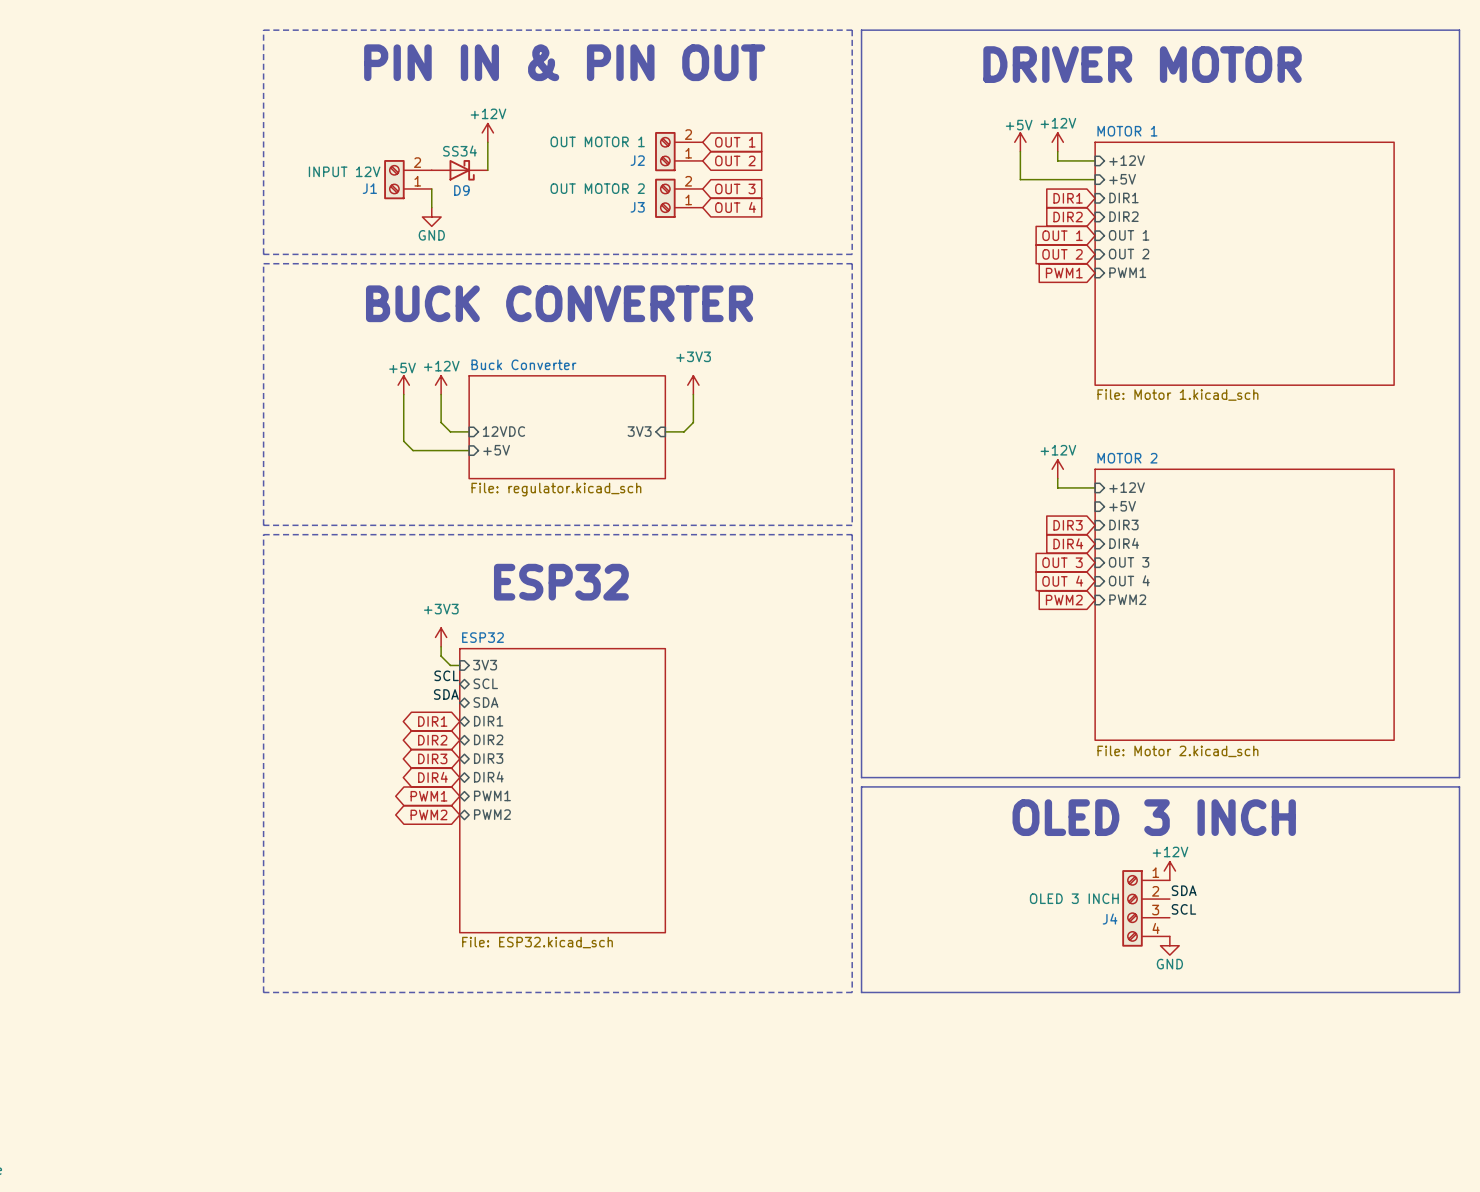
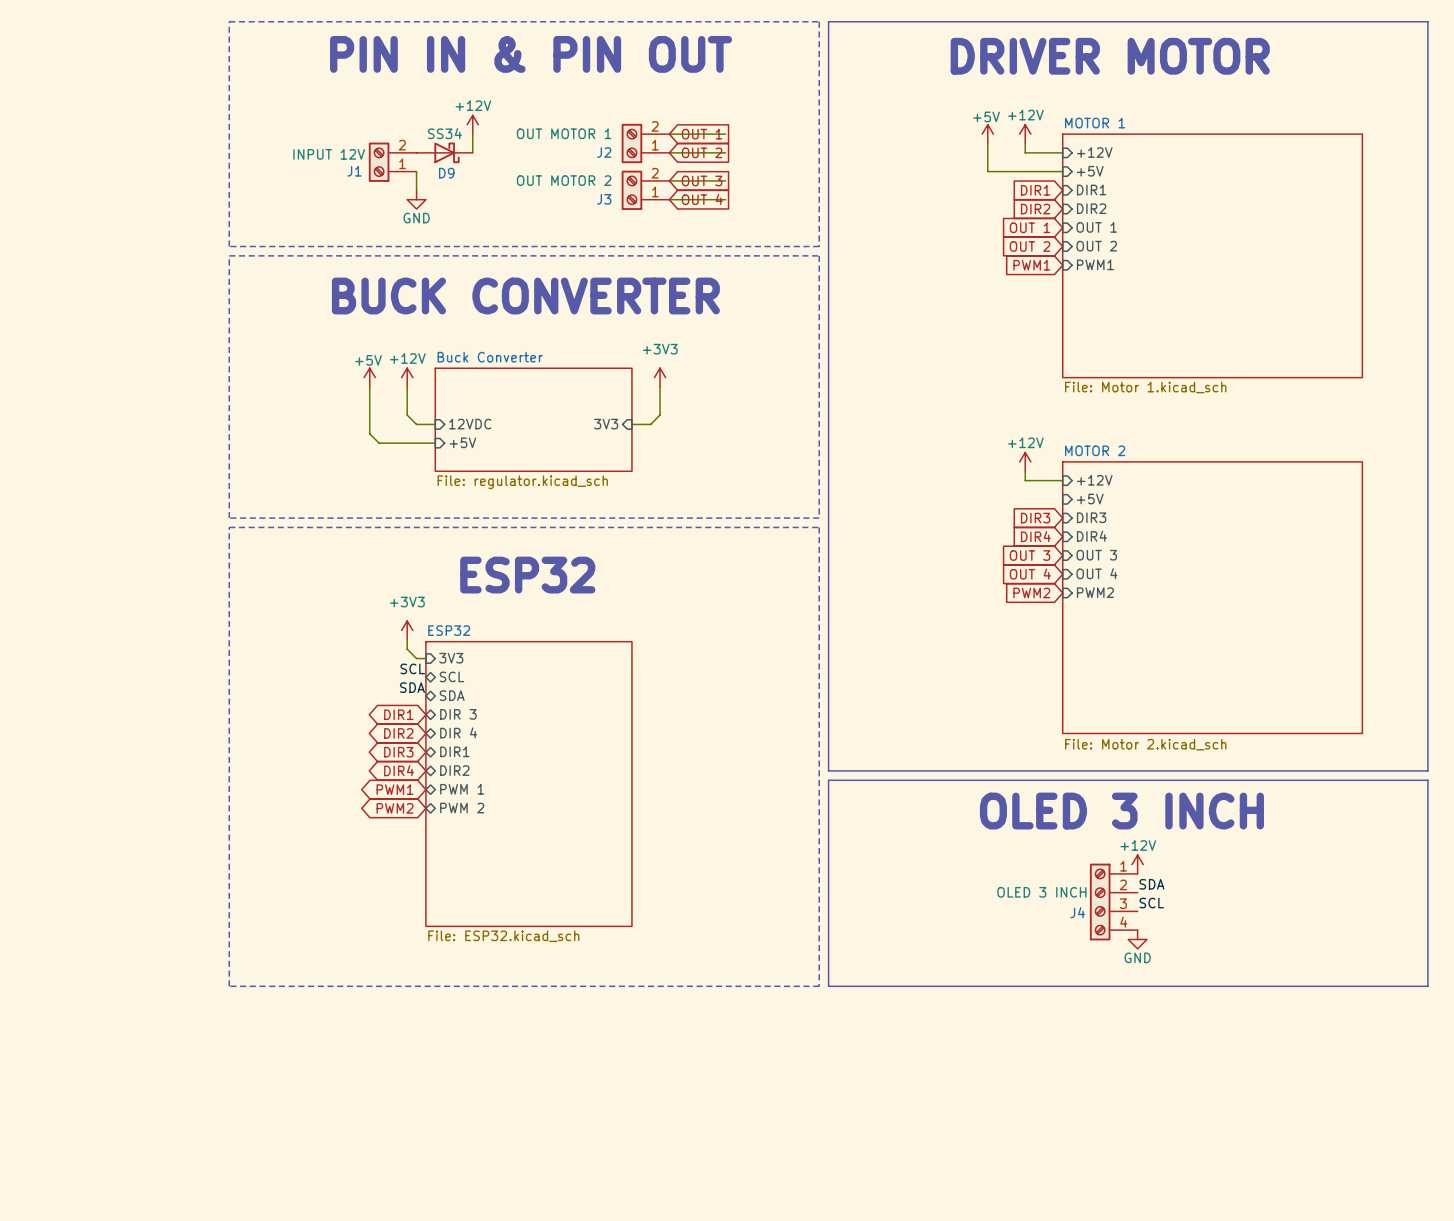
power symbol position: +12V (487, 132) -> +12V (472, 124)
wire: none -> (472, 134) (472, 152)
wire: none -> (669, 134) (725, 134)
wire: none -> (669, 152) (725, 152)
D9 position: (459, 170) -> (444, 152)
J1 position: (407, 179) -> (392, 162)
wire: (431, 188) (431, 207) -> (416, 171) (416, 190)
wire: none -> (669, 180) (725, 180)
wire: none -> (669, 199) (725, 199)
power symbol position: GND (431, 217) -> GND (416, 199)
sheet pin: DIR1 (488, 721) -> DIR 3 (458, 714)
sheet pin: DIR2 (488, 739) -> DIR 4 (458, 732)
sheet pin: DIR3 (488, 758) -> DIR1 (454, 751)
sheet pin: DIR4 (488, 777) -> DIR2 (454, 770)
sheet pin: PWM1 (492, 795) -> PWM 1 (462, 789)
sheet pin: PWM2 (492, 814) -> PWM 2 (462, 808)

